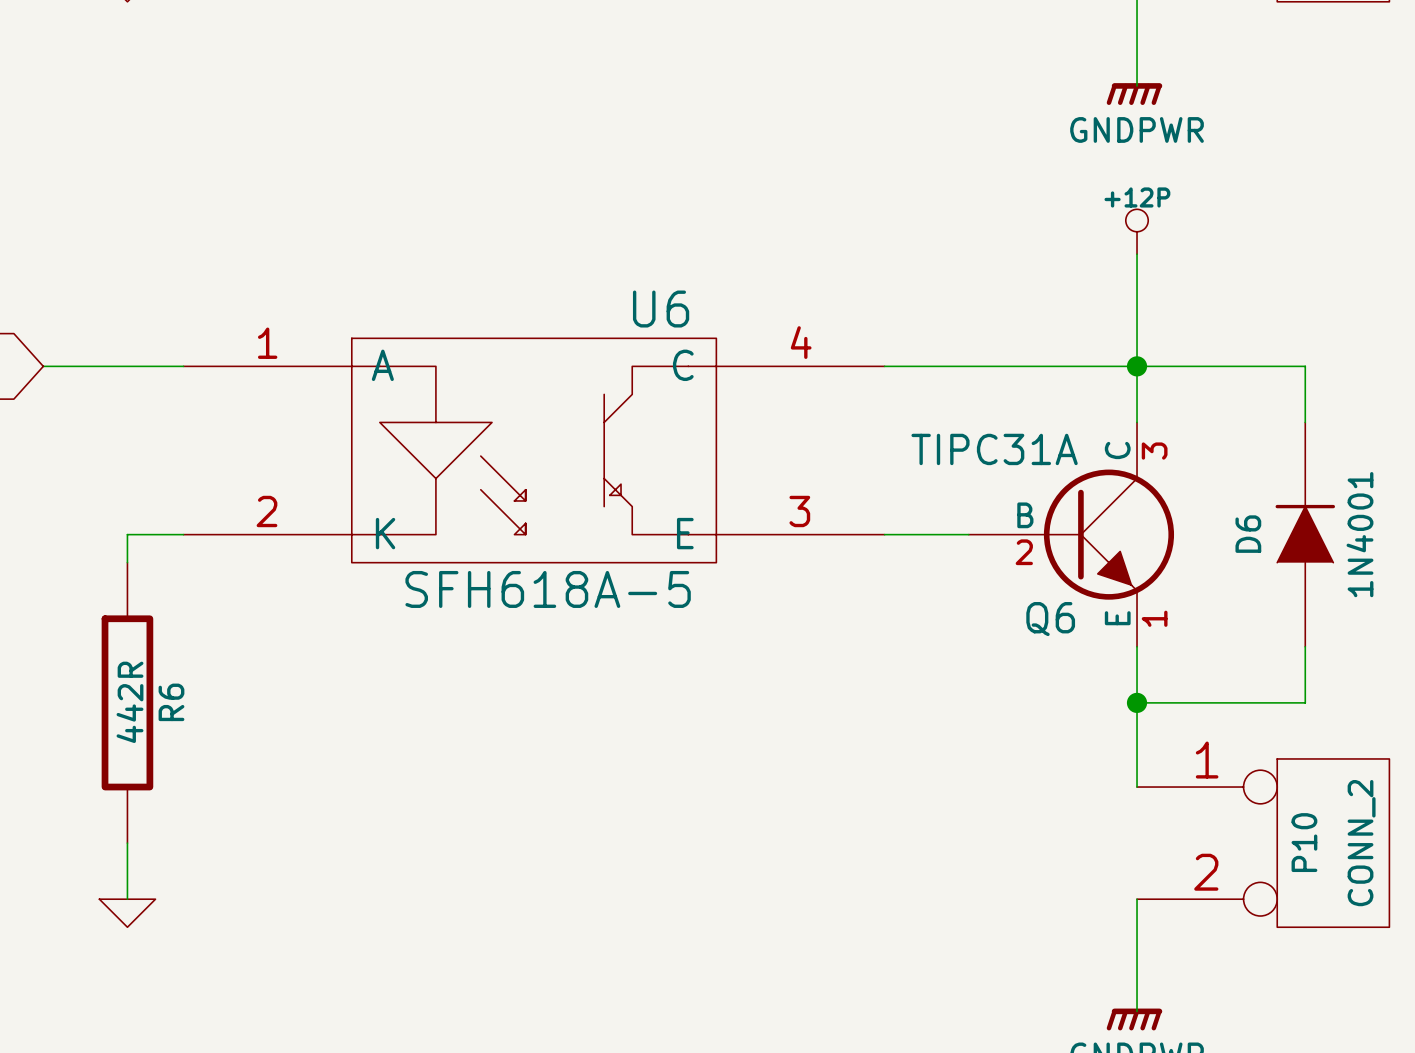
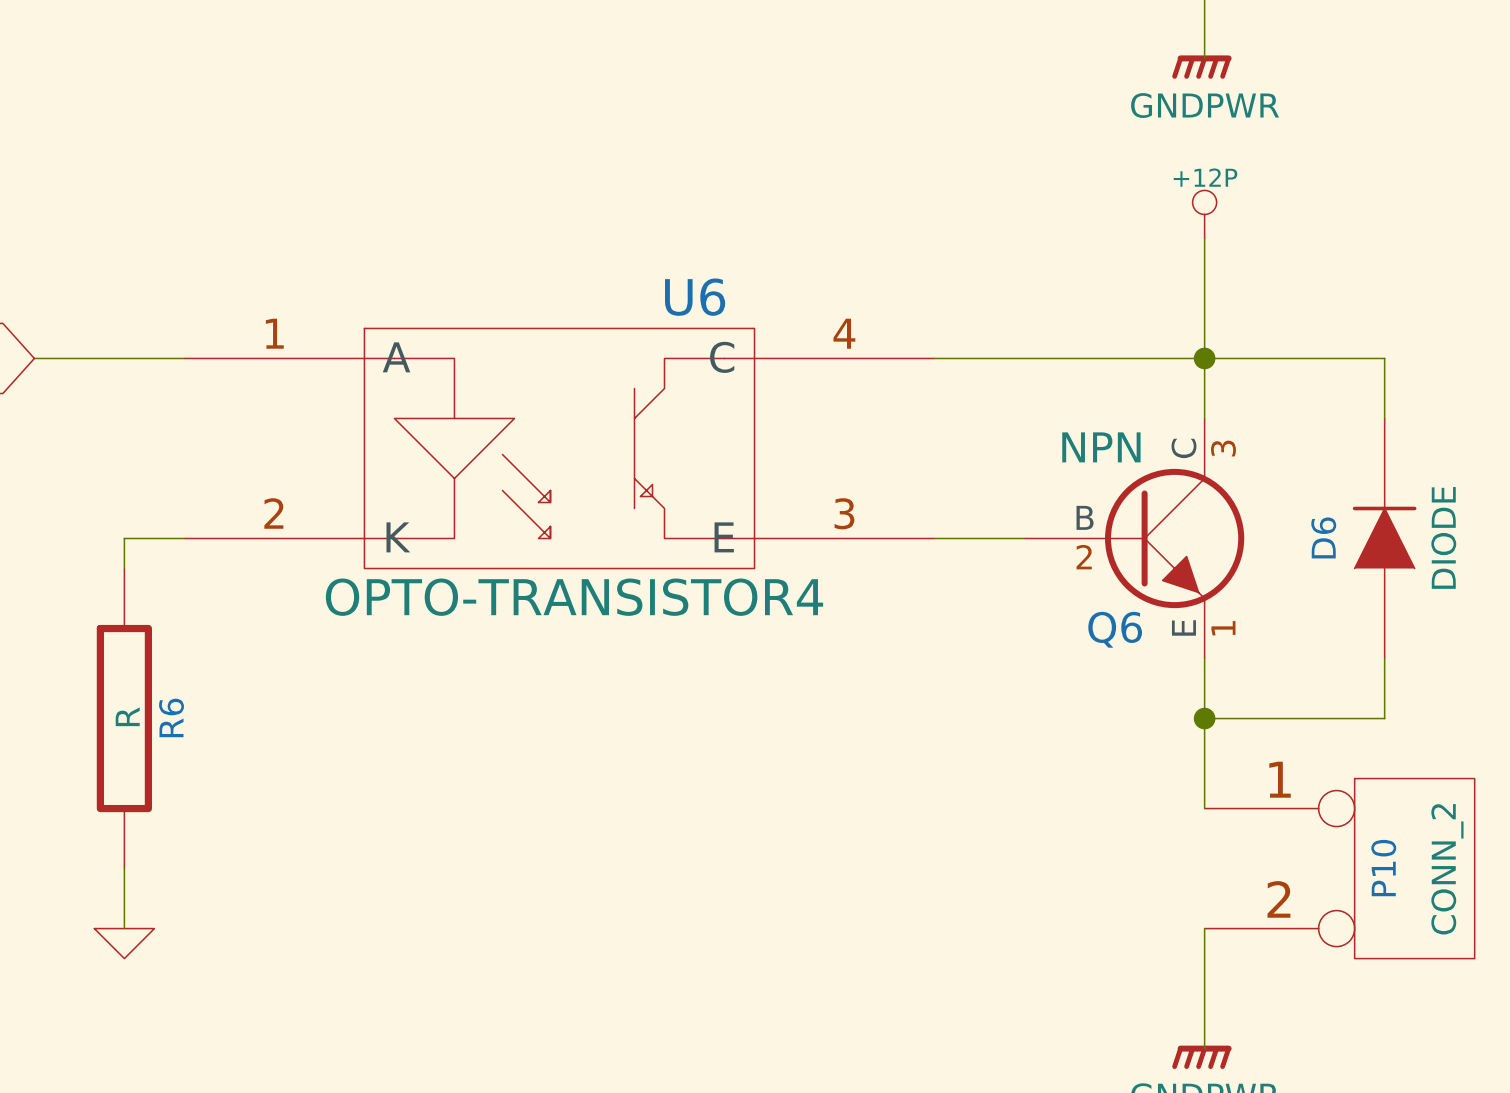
Q6 value: TIPC31A (994, 449) -> NPN (1101, 447)
D6 value: 1N4001 (1359, 534) -> DIODE (1443, 537)
U6 value: SFH618A-5 (548, 589) -> OPTO-TRANSISTOR4 (574, 597)
R6 value: 442R (130, 702) -> R (127, 716)

